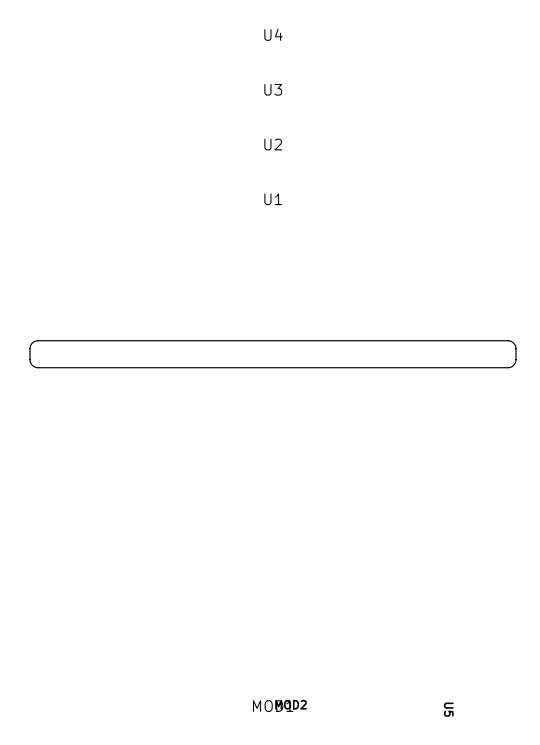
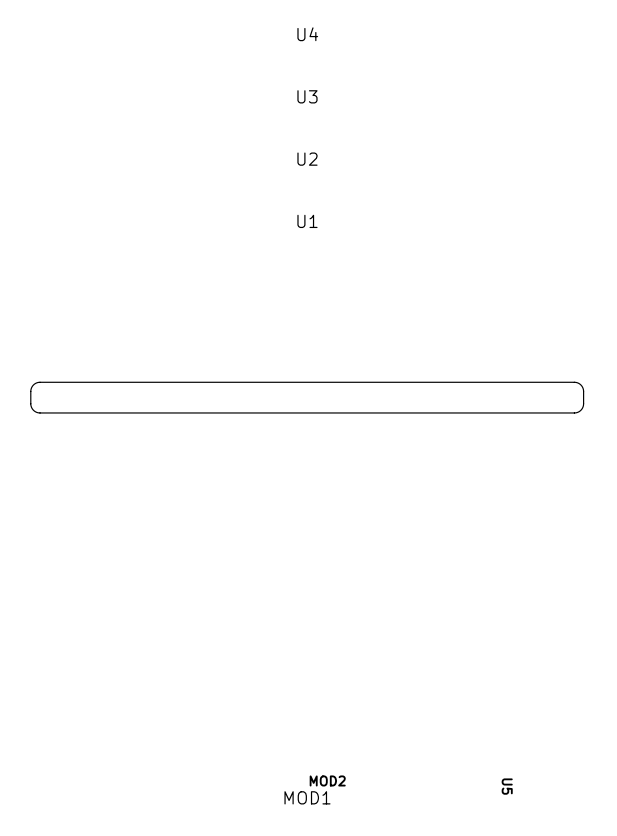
MOD2 position: (291, 704) -> (327, 780)
U5 position: (448, 709) -> (507, 786)

